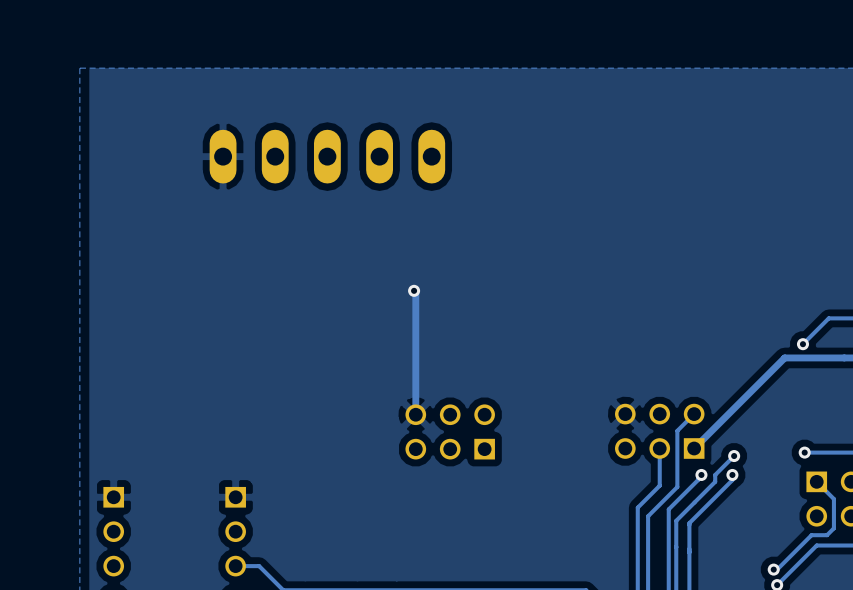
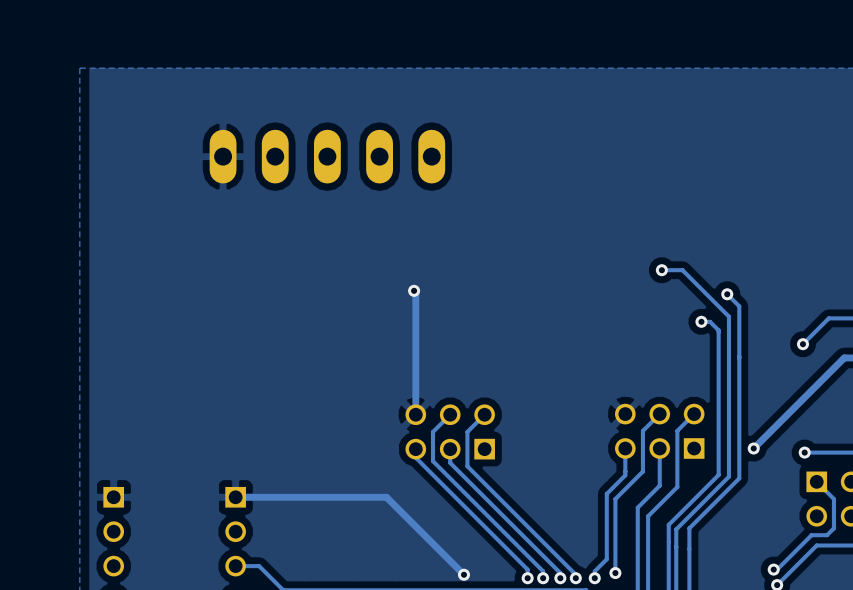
via: none -> (661, 270)
via: none -> (727, 294)
via: none -> (701, 321)
track: (844, 357) (784, 357) (694, 448) -> (844, 357) (753, 448)
track: none -> (450, 414) (433, 431) (433, 461) (543, 571) (543, 578)
track: none -> (484, 414) (467, 431) (467, 466) (575, 574) (575, 578)
track: none -> (659, 414) (642, 430) (642, 471) (615, 499) (615, 573)
track: none -> (625, 448) (625, 475) (606, 493) (606, 559) (594, 571) (594, 578)
via: none -> (753, 448)
track: none -> (415, 449) (415, 457) (527, 569) (527, 578)
track: none -> (450, 449) (450, 462) (560, 573) (560, 578) (558, 576)
track: (734, 456) (715, 474) (715, 481) (676, 520) (676, 529) -> (661, 270) (682, 270) (728, 316) (728, 476) (676, 529)
via: (734, 456) -> none
track: (701, 474) (668, 509) (668, 524) -> (701, 321) (710, 321) (718, 330) (718, 474) (668, 524)
via: (701, 474) -> none
track: (732, 474) (732, 480) (689, 523) (689, 528) -> (727, 294) (739, 306) (739, 478) (689, 528)
via: (732, 474) -> none
track: none -> (235, 497) (386, 497) (463, 574)
via: none -> (615, 573)
via: none -> (463, 574)
via: none -> (527, 578)
via: none -> (543, 578)
via: none -> (560, 578)
via: none -> (575, 578)
via: none -> (594, 578)

